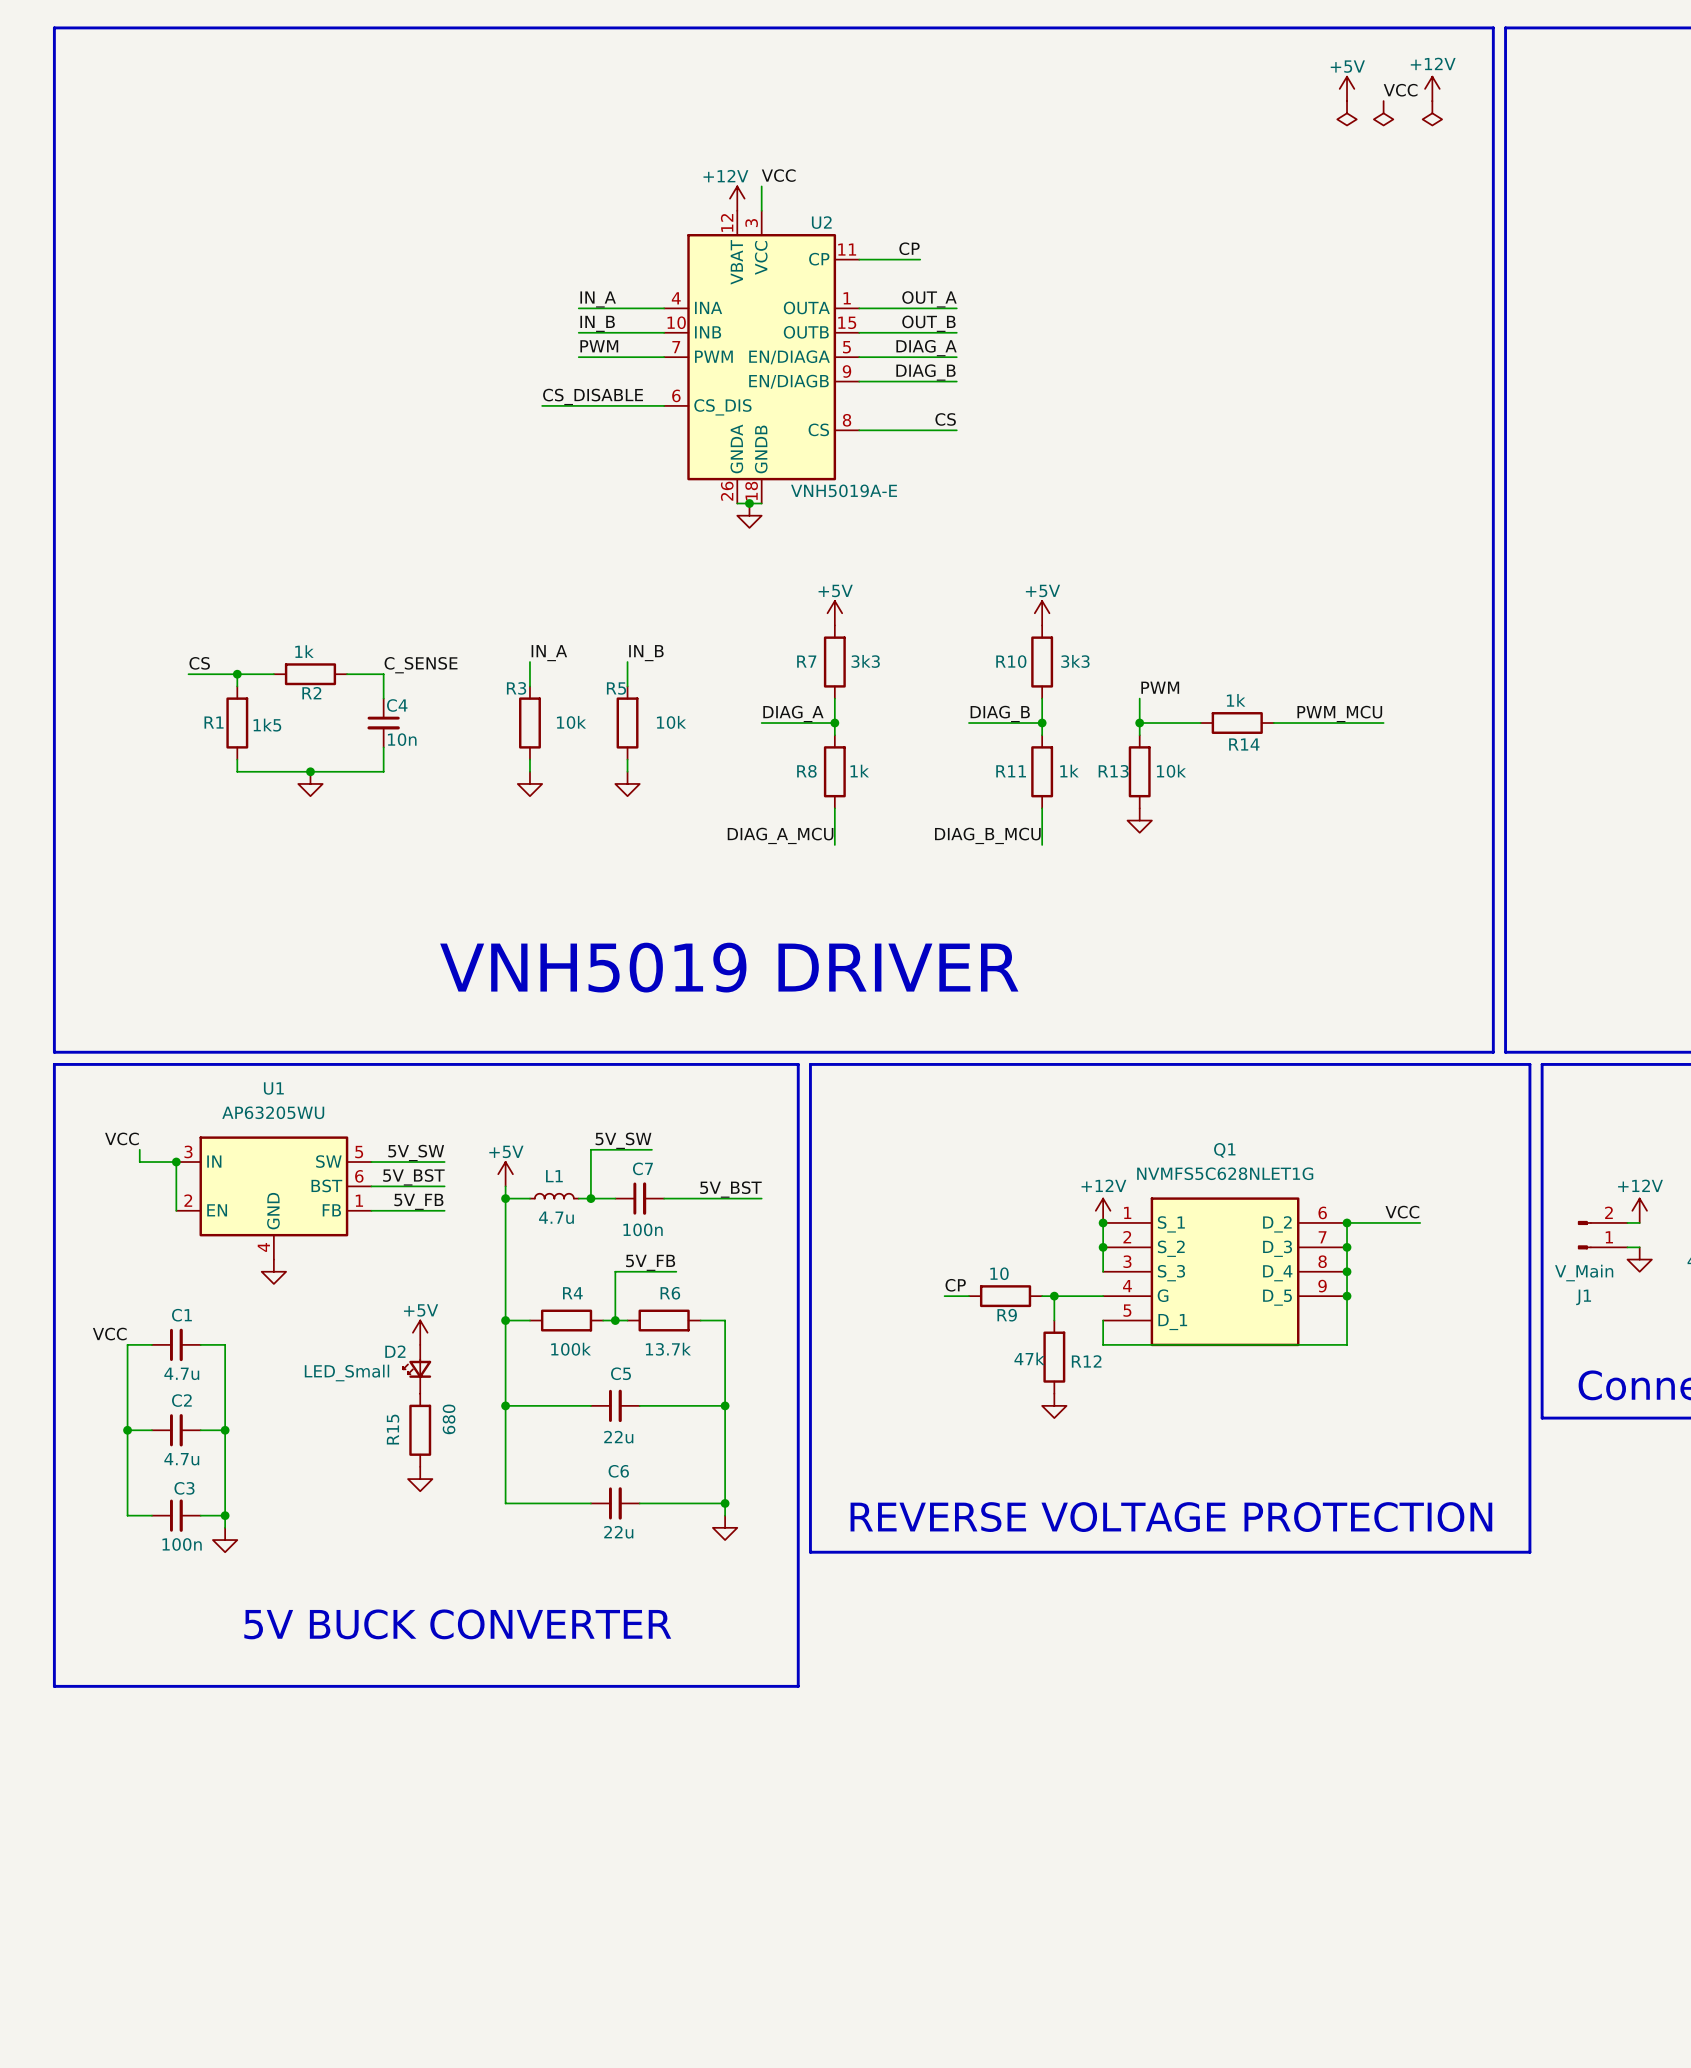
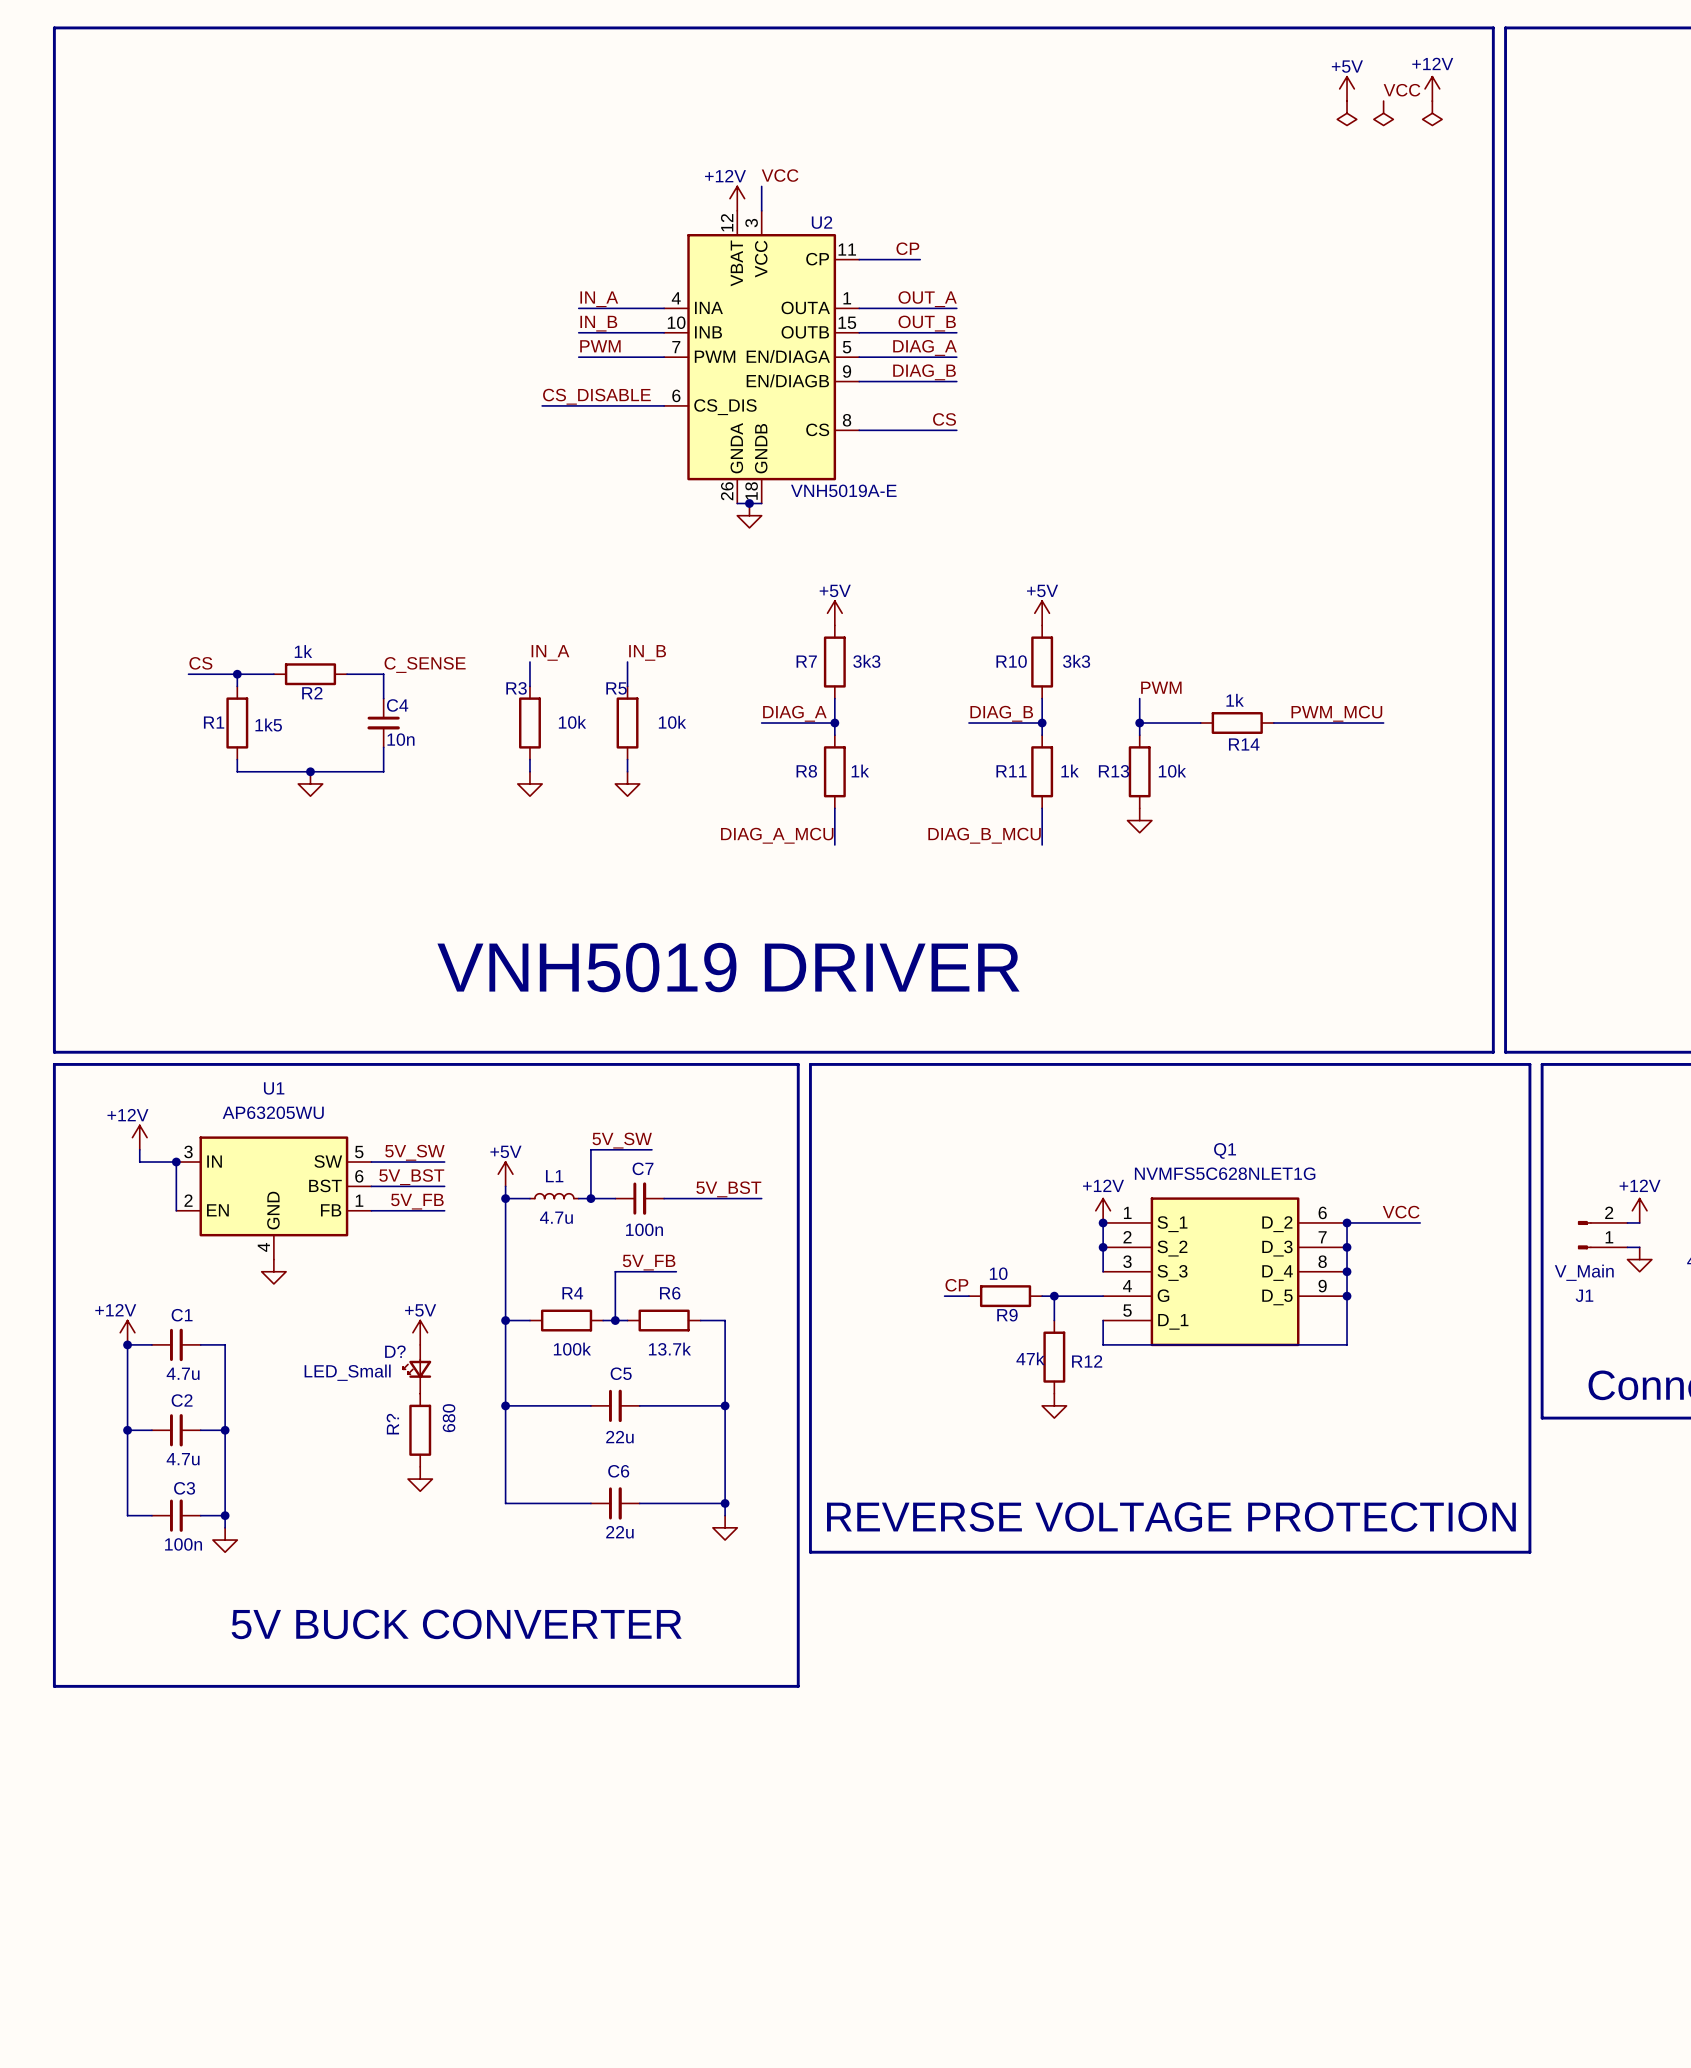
power symbol: none -> +12V (139, 1137)
label: VCC (121, 1138) -> none
power symbol: none -> +12V (127, 1332)
label: VCC (109, 1334) -> none
junction: none -> (127, 1344)
D2 name: D2 (395, 1351) -> D? (395, 1351)
R15 name: R15 (393, 1429) -> R? (392, 1424)

